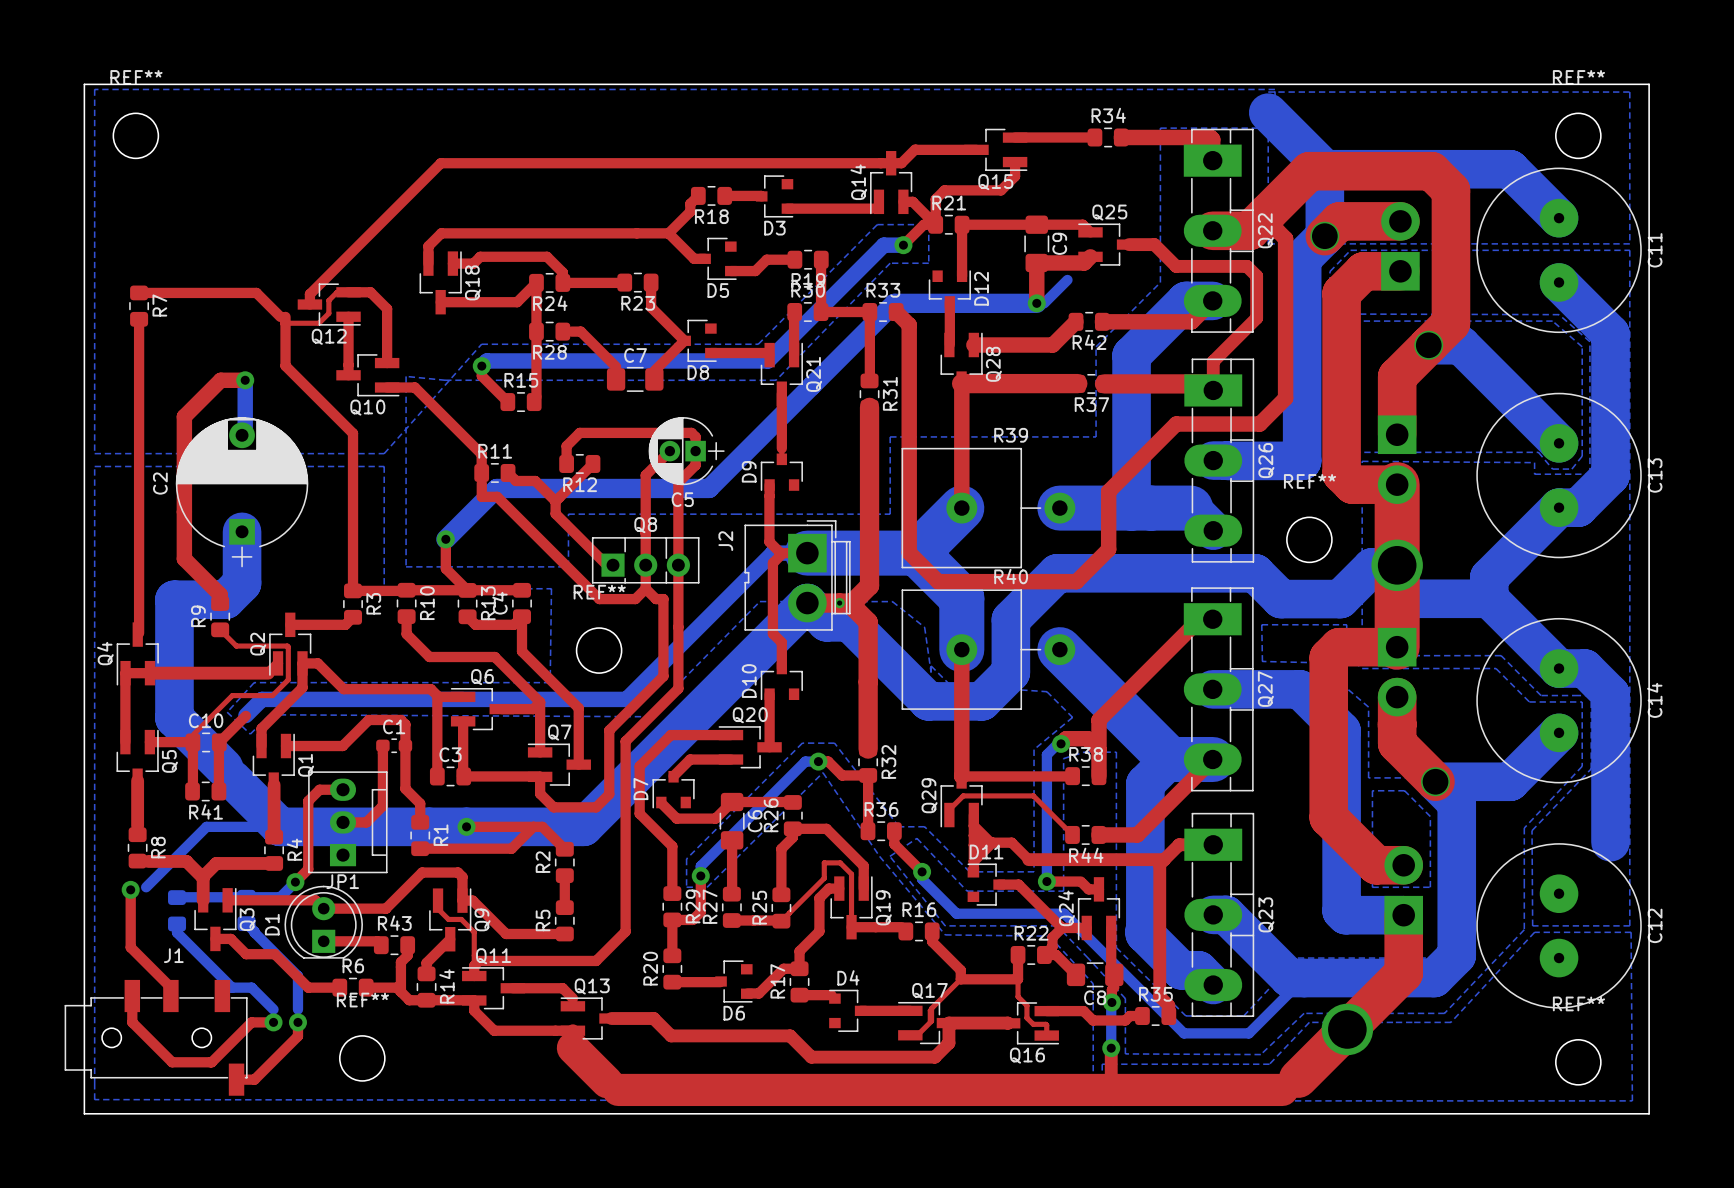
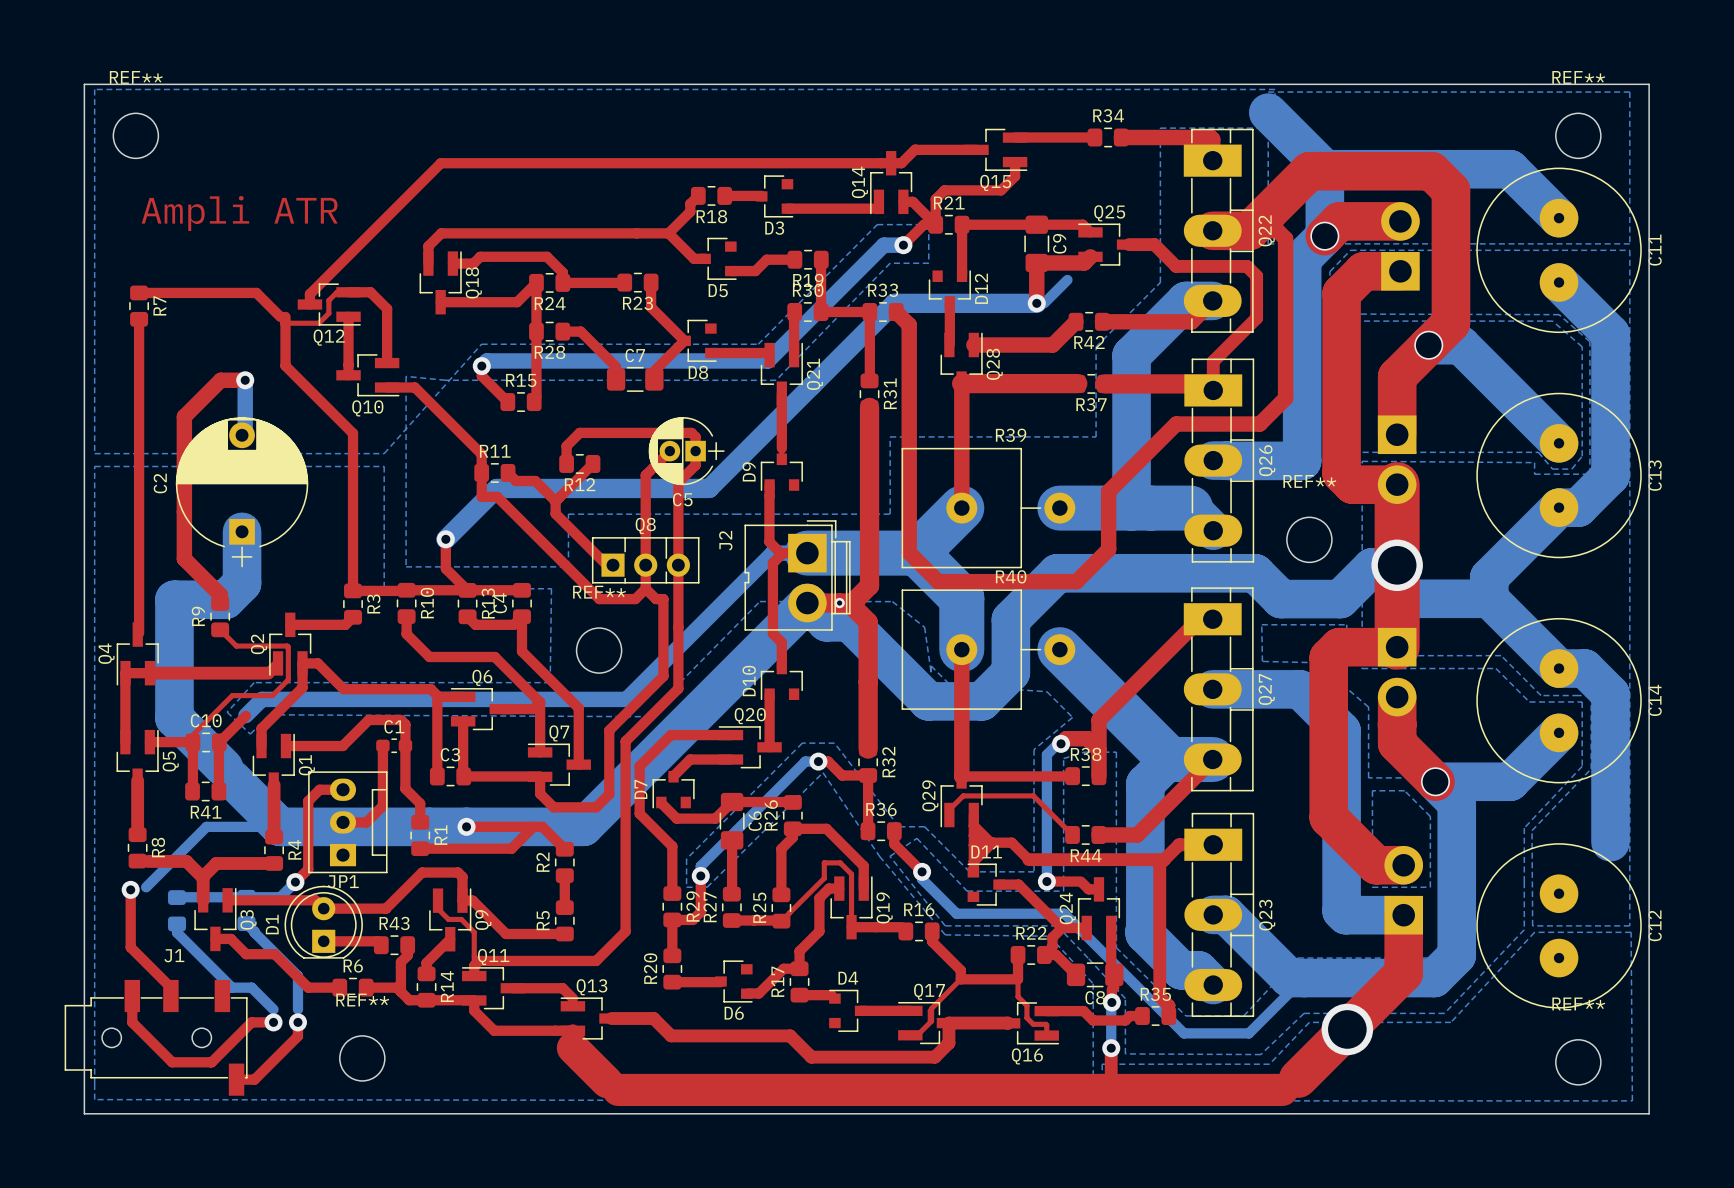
text: none -> Ampli ATR (239, 213)

